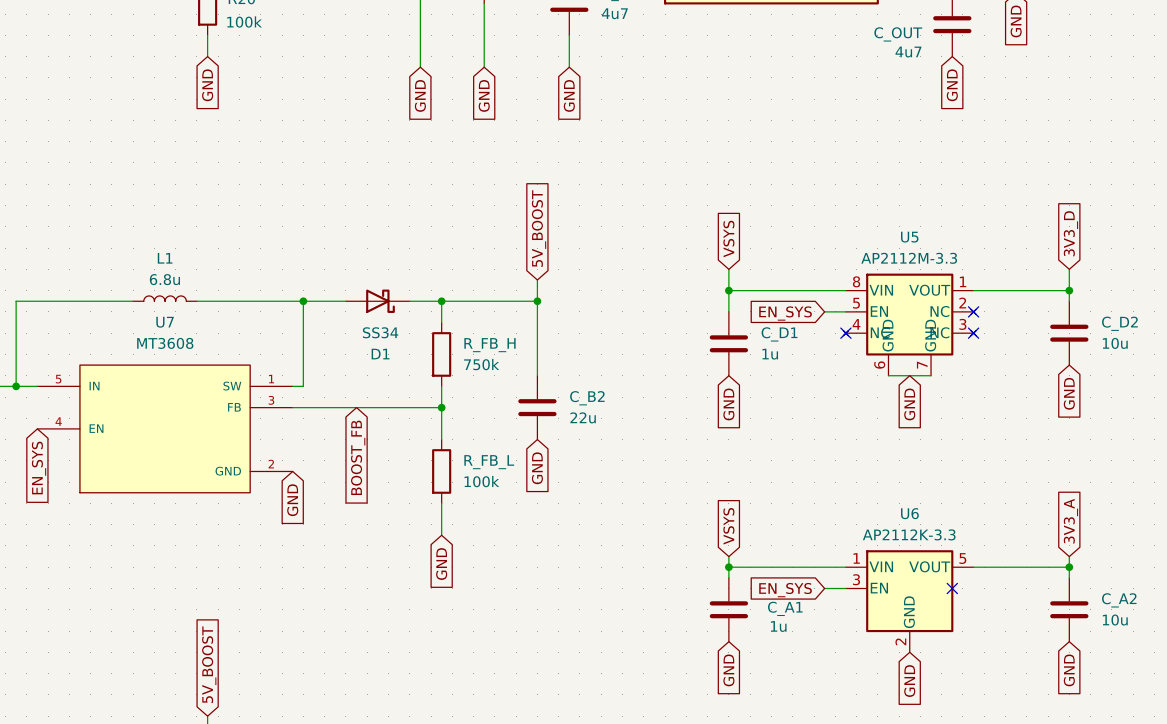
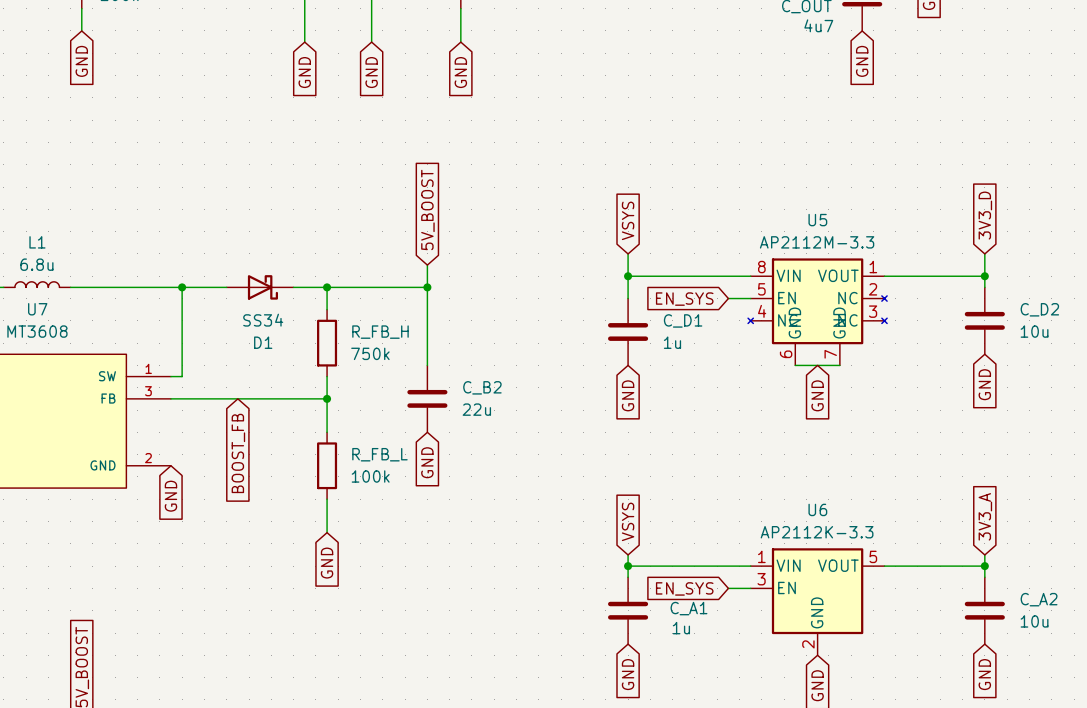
no-connect mark: (973, 311) -> none
no-connect mark: (845, 333) -> none
no-connect mark: (973, 333) -> none
no-connect mark: (952, 588) -> none

